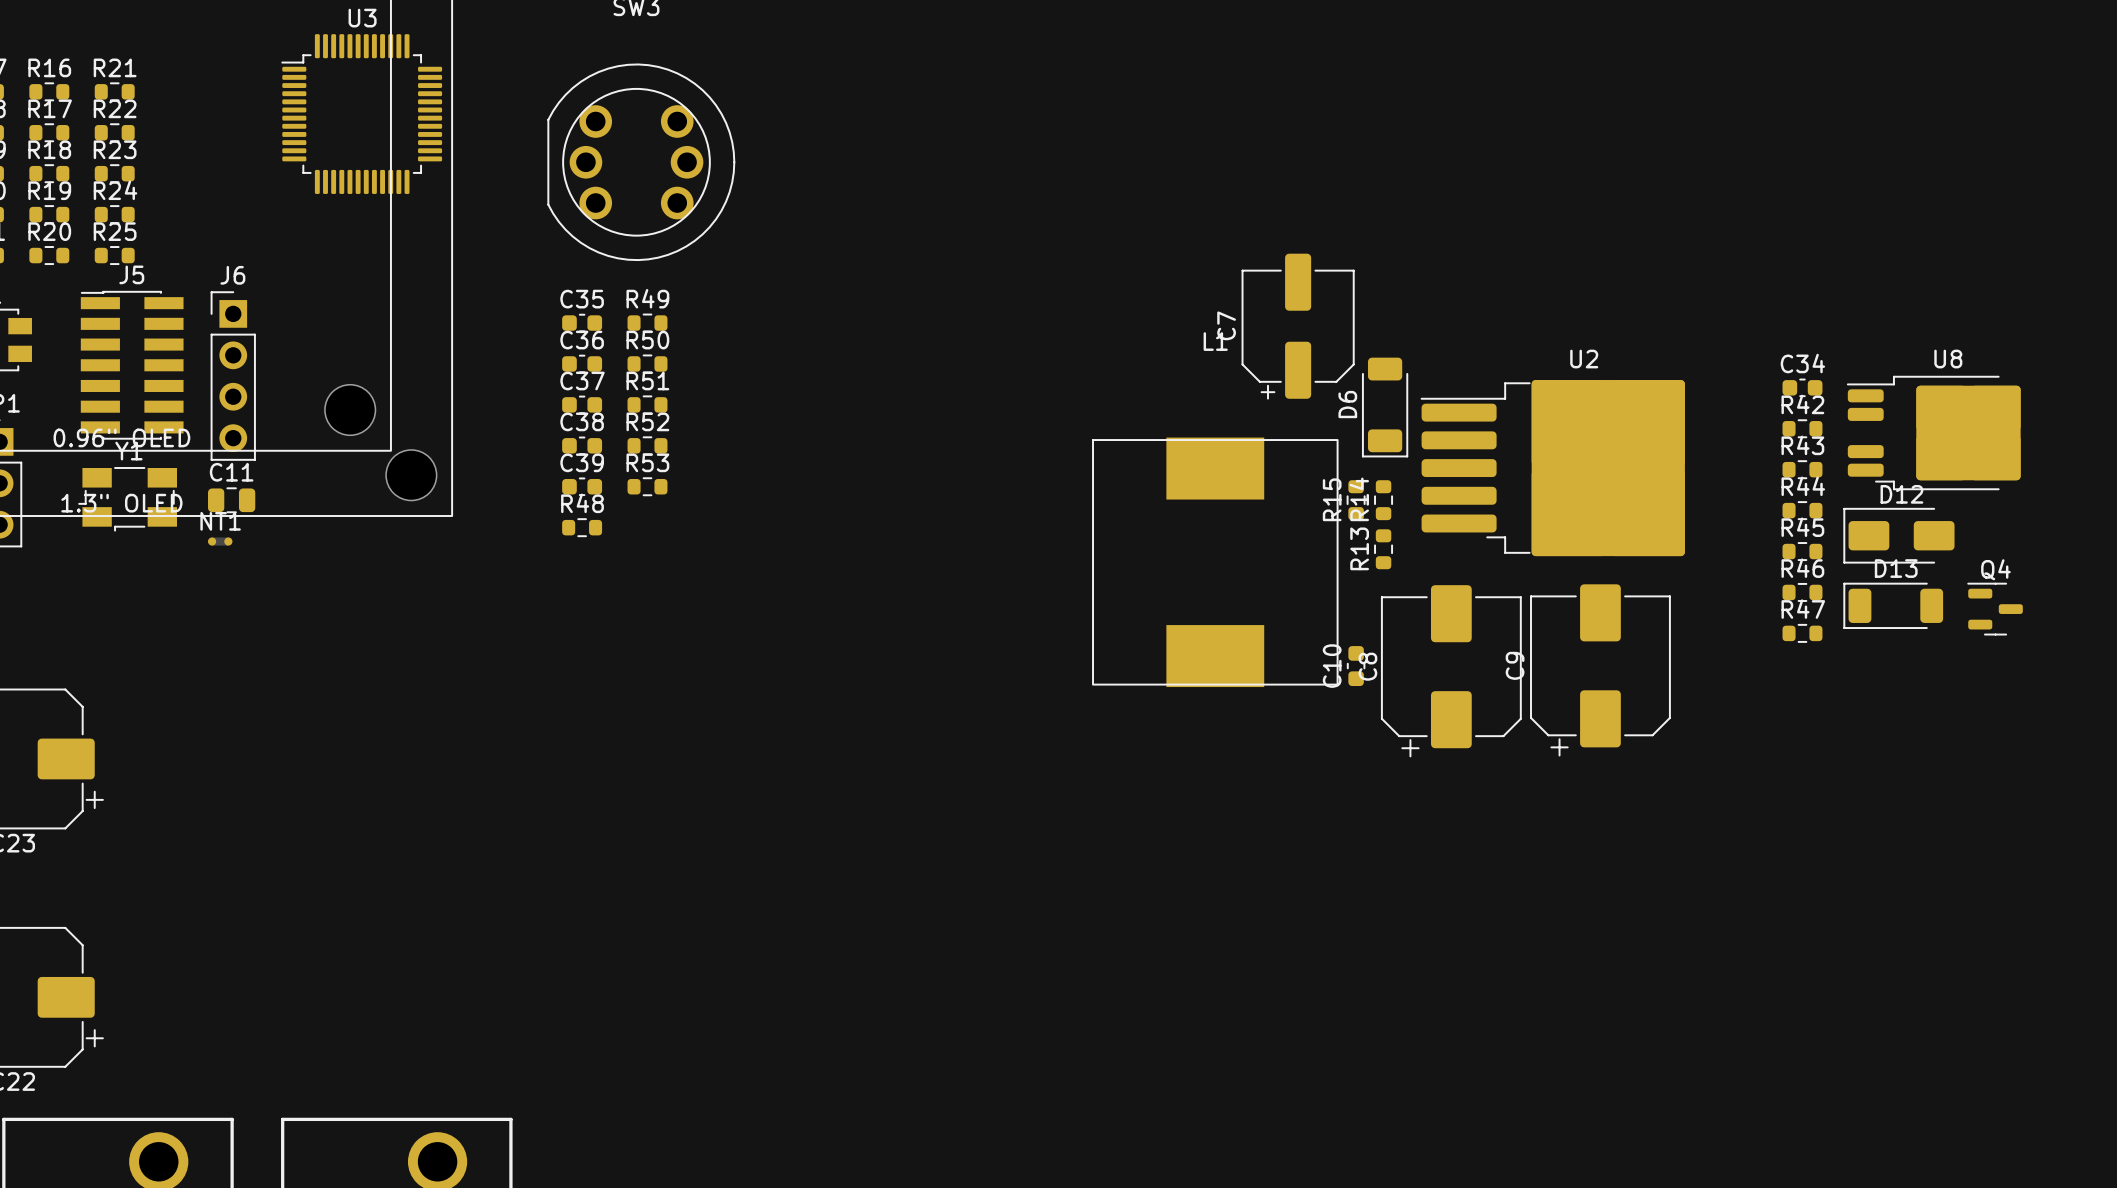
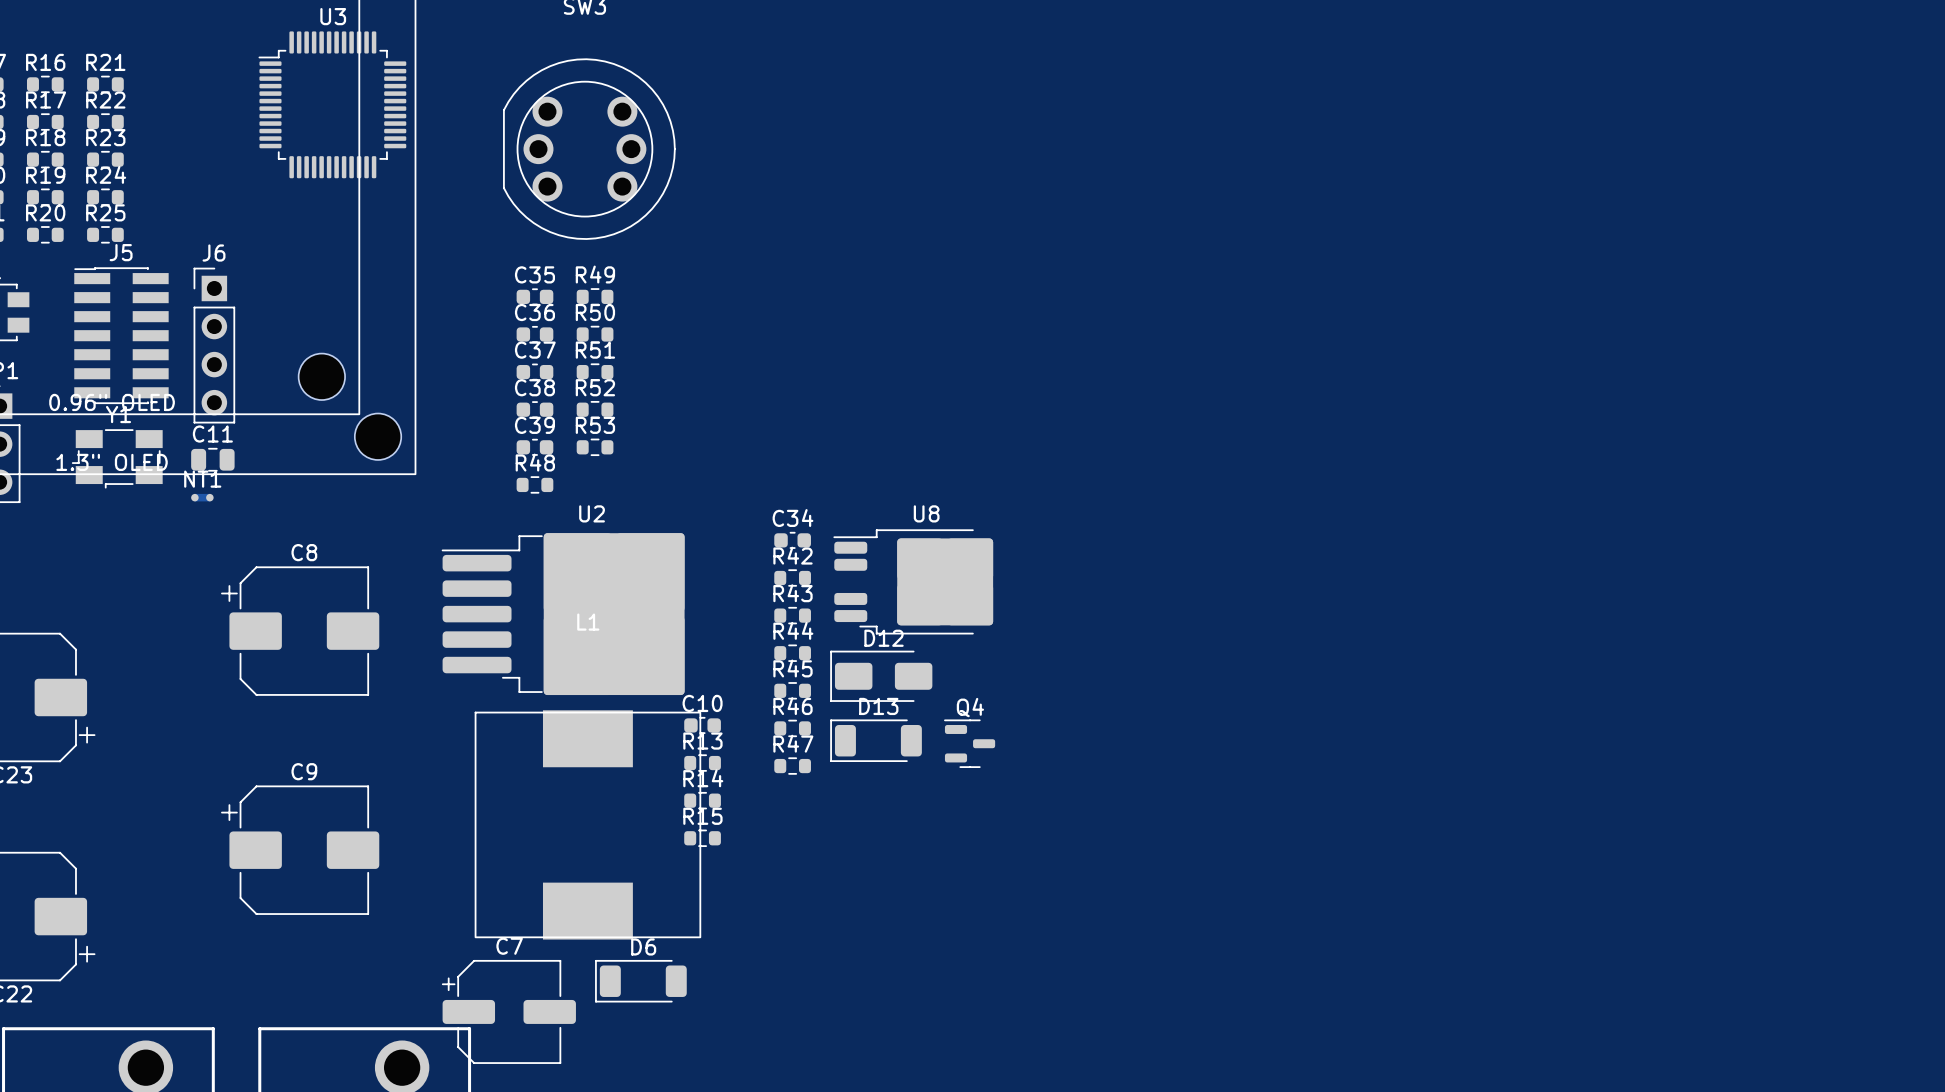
C7 rotation: 0° (1298, 326) -> 90° clockwise (508, 1011)
C7 position: (1298, 326) -> (508, 1011)
C34 position: (1802, 387) -> (792, 540)
D6 rotation: 0° (1385, 407) -> 90° clockwise (640, 981)
D6 position: (1385, 407) -> (640, 981)
R42 position: (1802, 428) -> (792, 577)
U8 position: (1933, 433) -> (913, 581)
U2 position: (1552, 468) -> (563, 614)
R43 position: (1802, 469) -> (792, 615)
R15 rotation: 0° (1356, 500) -> 90° clockwise (702, 838)
R15 position: (1356, 500) -> (702, 838)
R14 rotation: 0° (1383, 500) -> 90° clockwise (702, 800)
R14 position: (1383, 500) -> (702, 800)
R44 position: (1802, 510) -> (792, 653)
D12 position: (1898, 535) -> (881, 676)
R13 rotation: 0° (1383, 549) -> 90° clockwise (702, 763)
R13 position: (1383, 549) -> (702, 763)
R45 position: (1802, 551) -> (792, 690)
L1 position: (1215, 562) -> (587, 824)
R46 position: (1802, 592) -> (792, 728)
D13 position: (1893, 605) -> (876, 740)
Q4 position: (1995, 609) -> (969, 743)
R47 position: (1802, 633) -> (792, 766)
C10 rotation: 0° (1356, 666) -> 90° clockwise (702, 725)
C10 position: (1356, 666) -> (702, 725)
C9 rotation: 0° (1600, 670) -> 90° clockwise (300, 850)
C9 position: (1600, 670) -> (300, 850)
C8 rotation: 0° (1451, 671) -> 90° clockwise (300, 631)
C8 position: (1451, 671) -> (300, 631)

